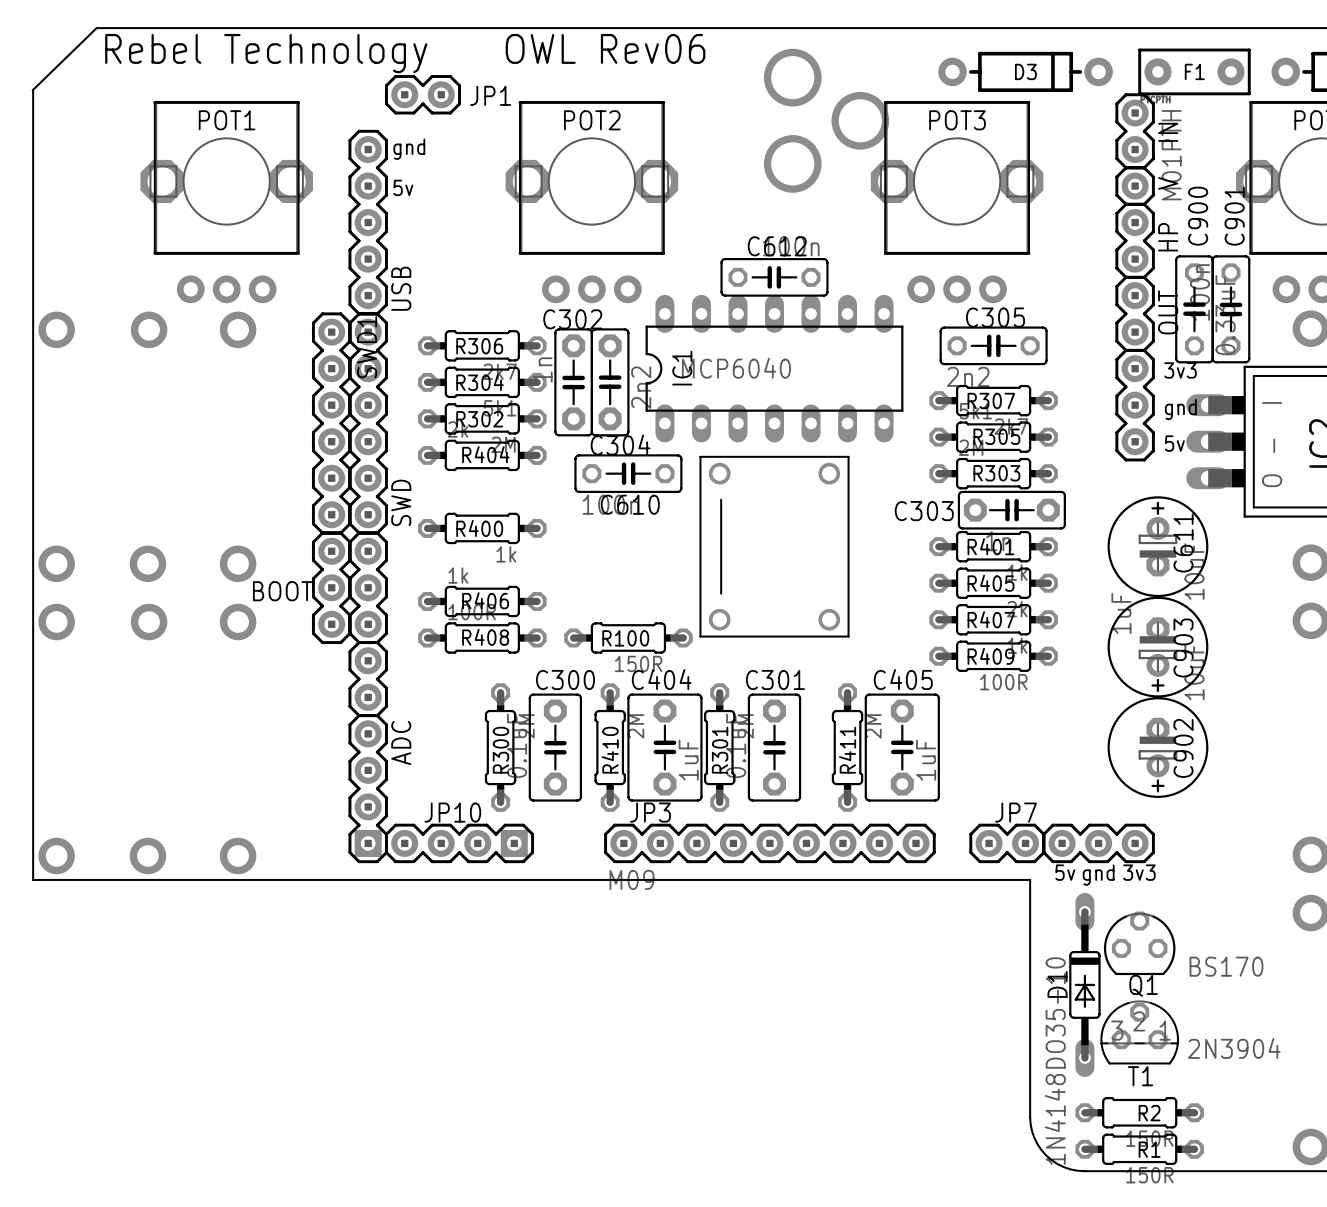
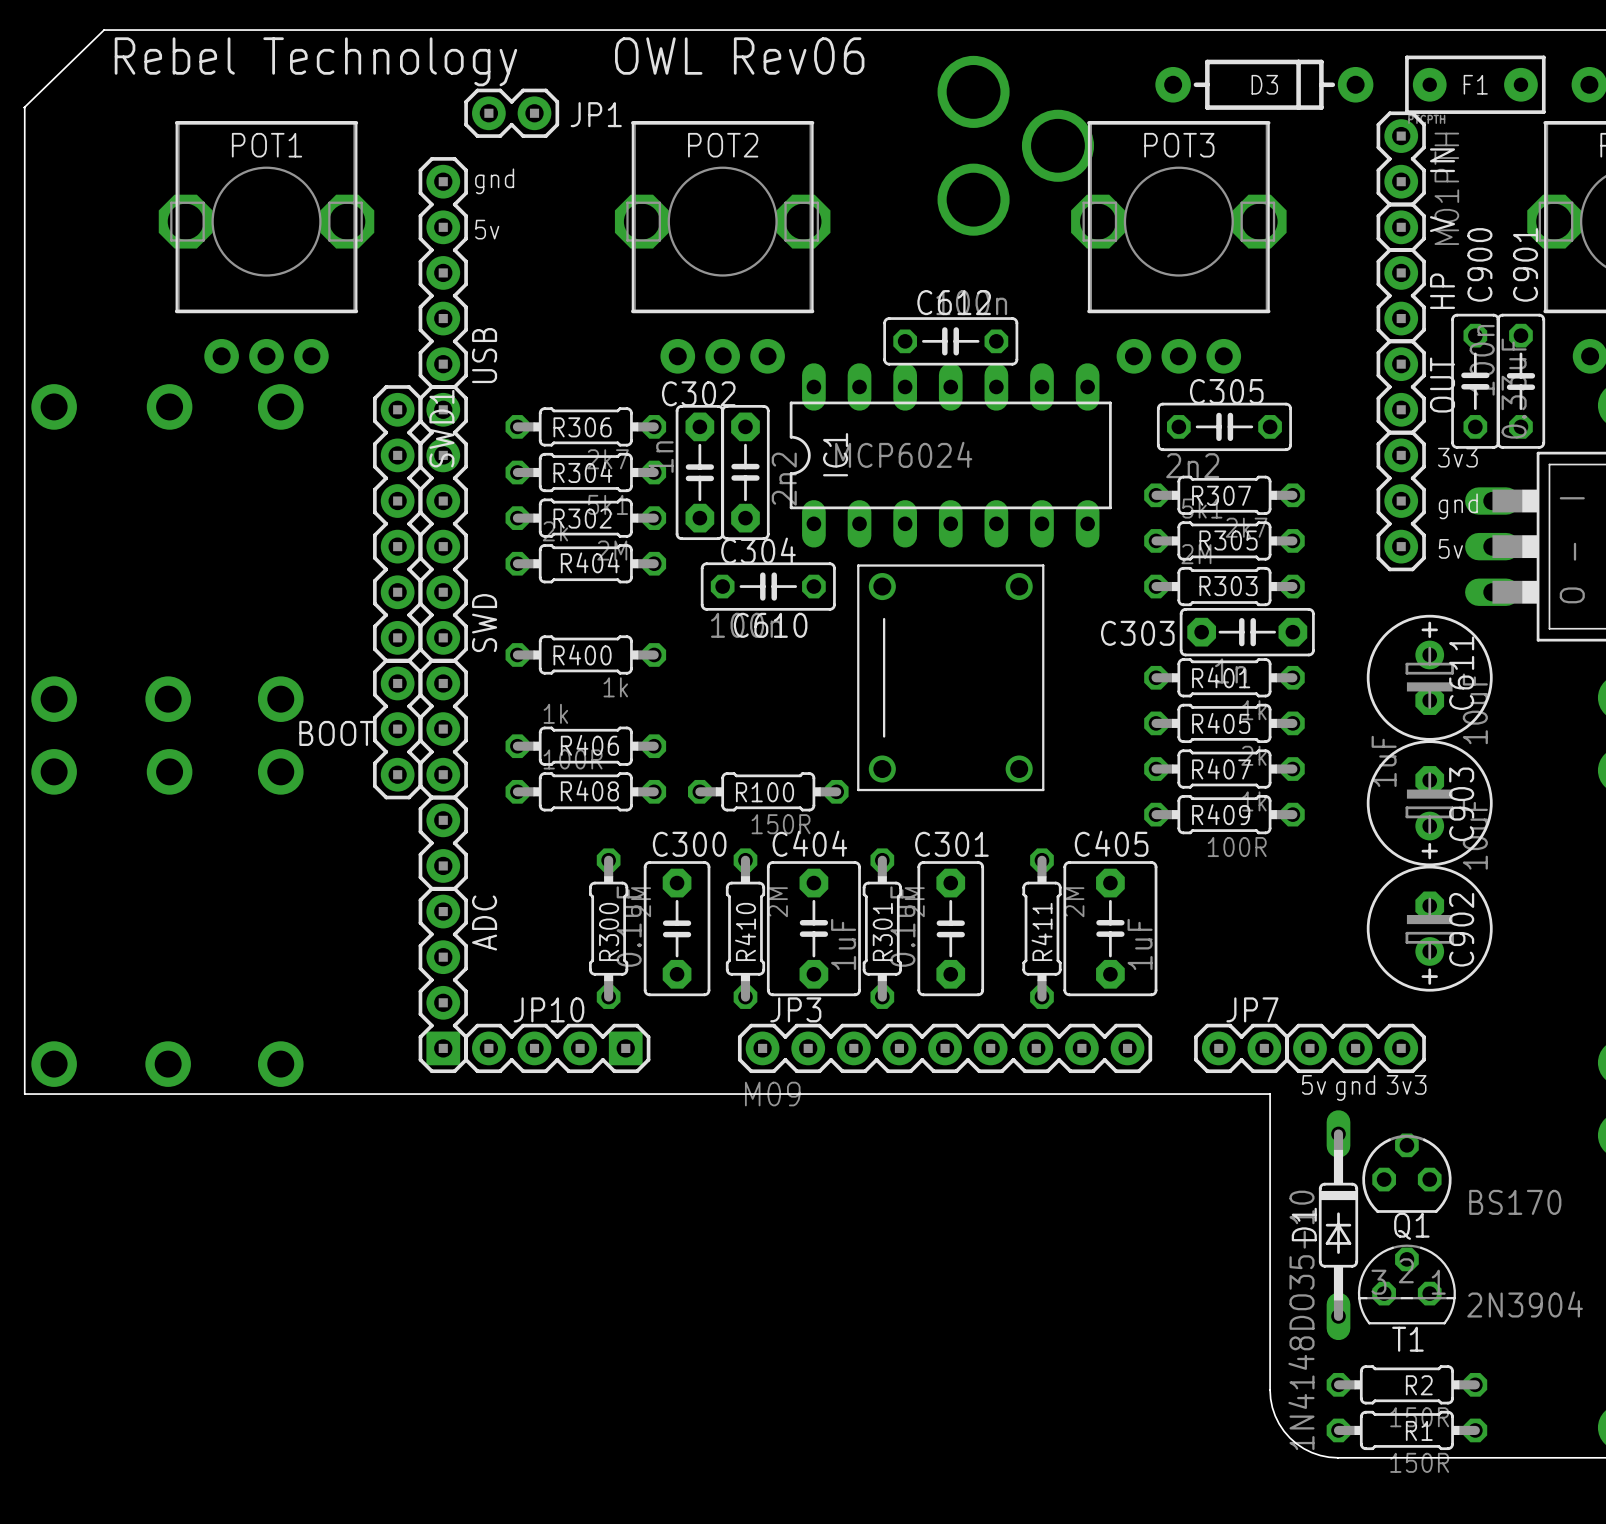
IC1 value: MCP6040 (736, 368) -> MCP6024 (903, 454)

